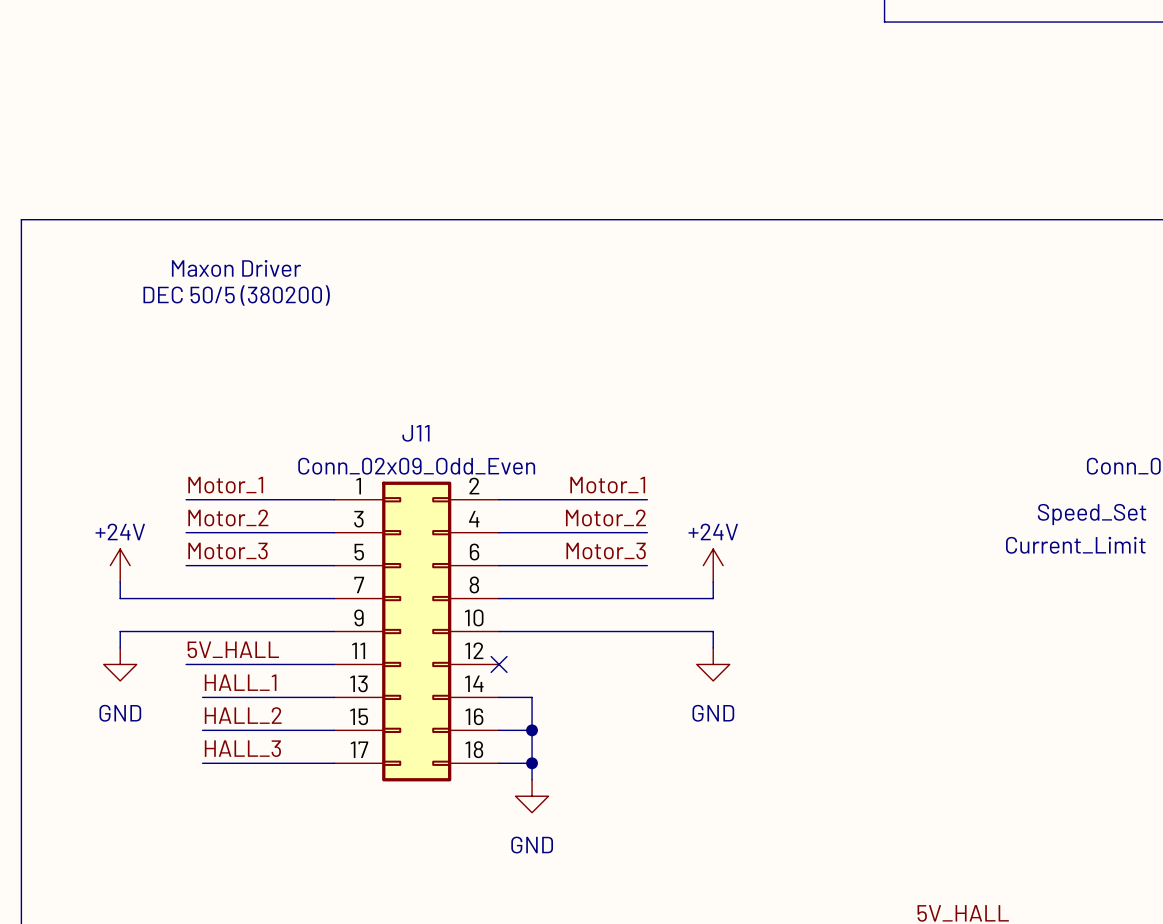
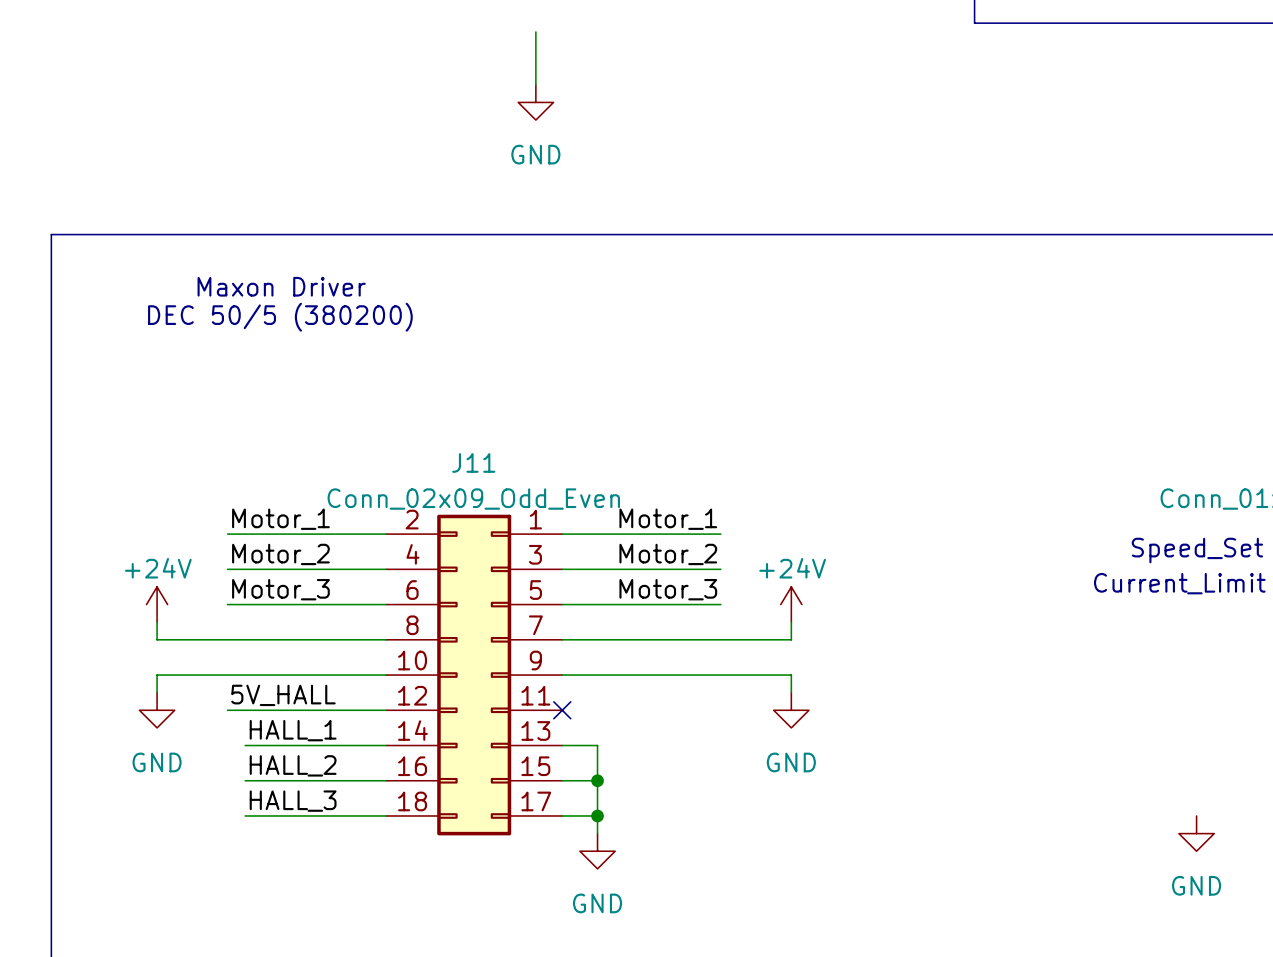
wire: none -> (535, 31) (535, 84)
power symbol: none -> GND (535, 102)
J11 flip: as is (416, 631) -> left-right (474, 675)
power symbol: none -> GND (1196, 833)

